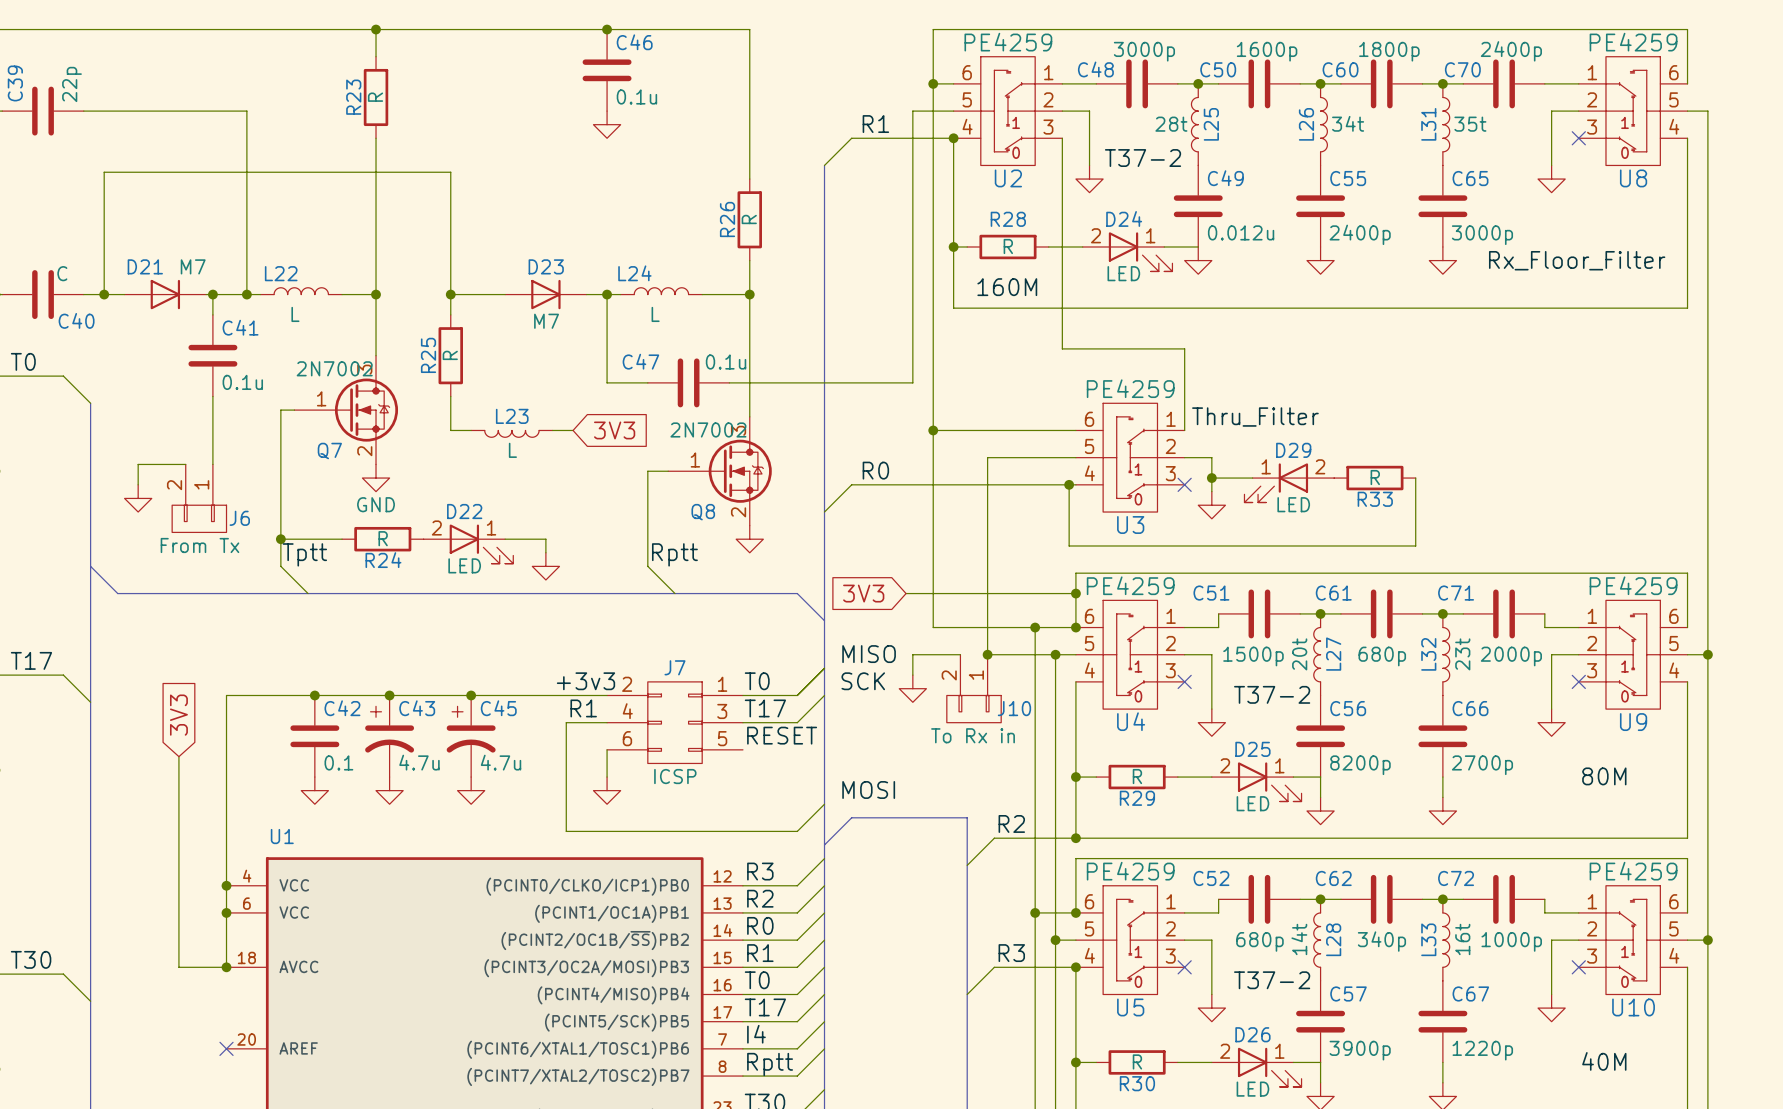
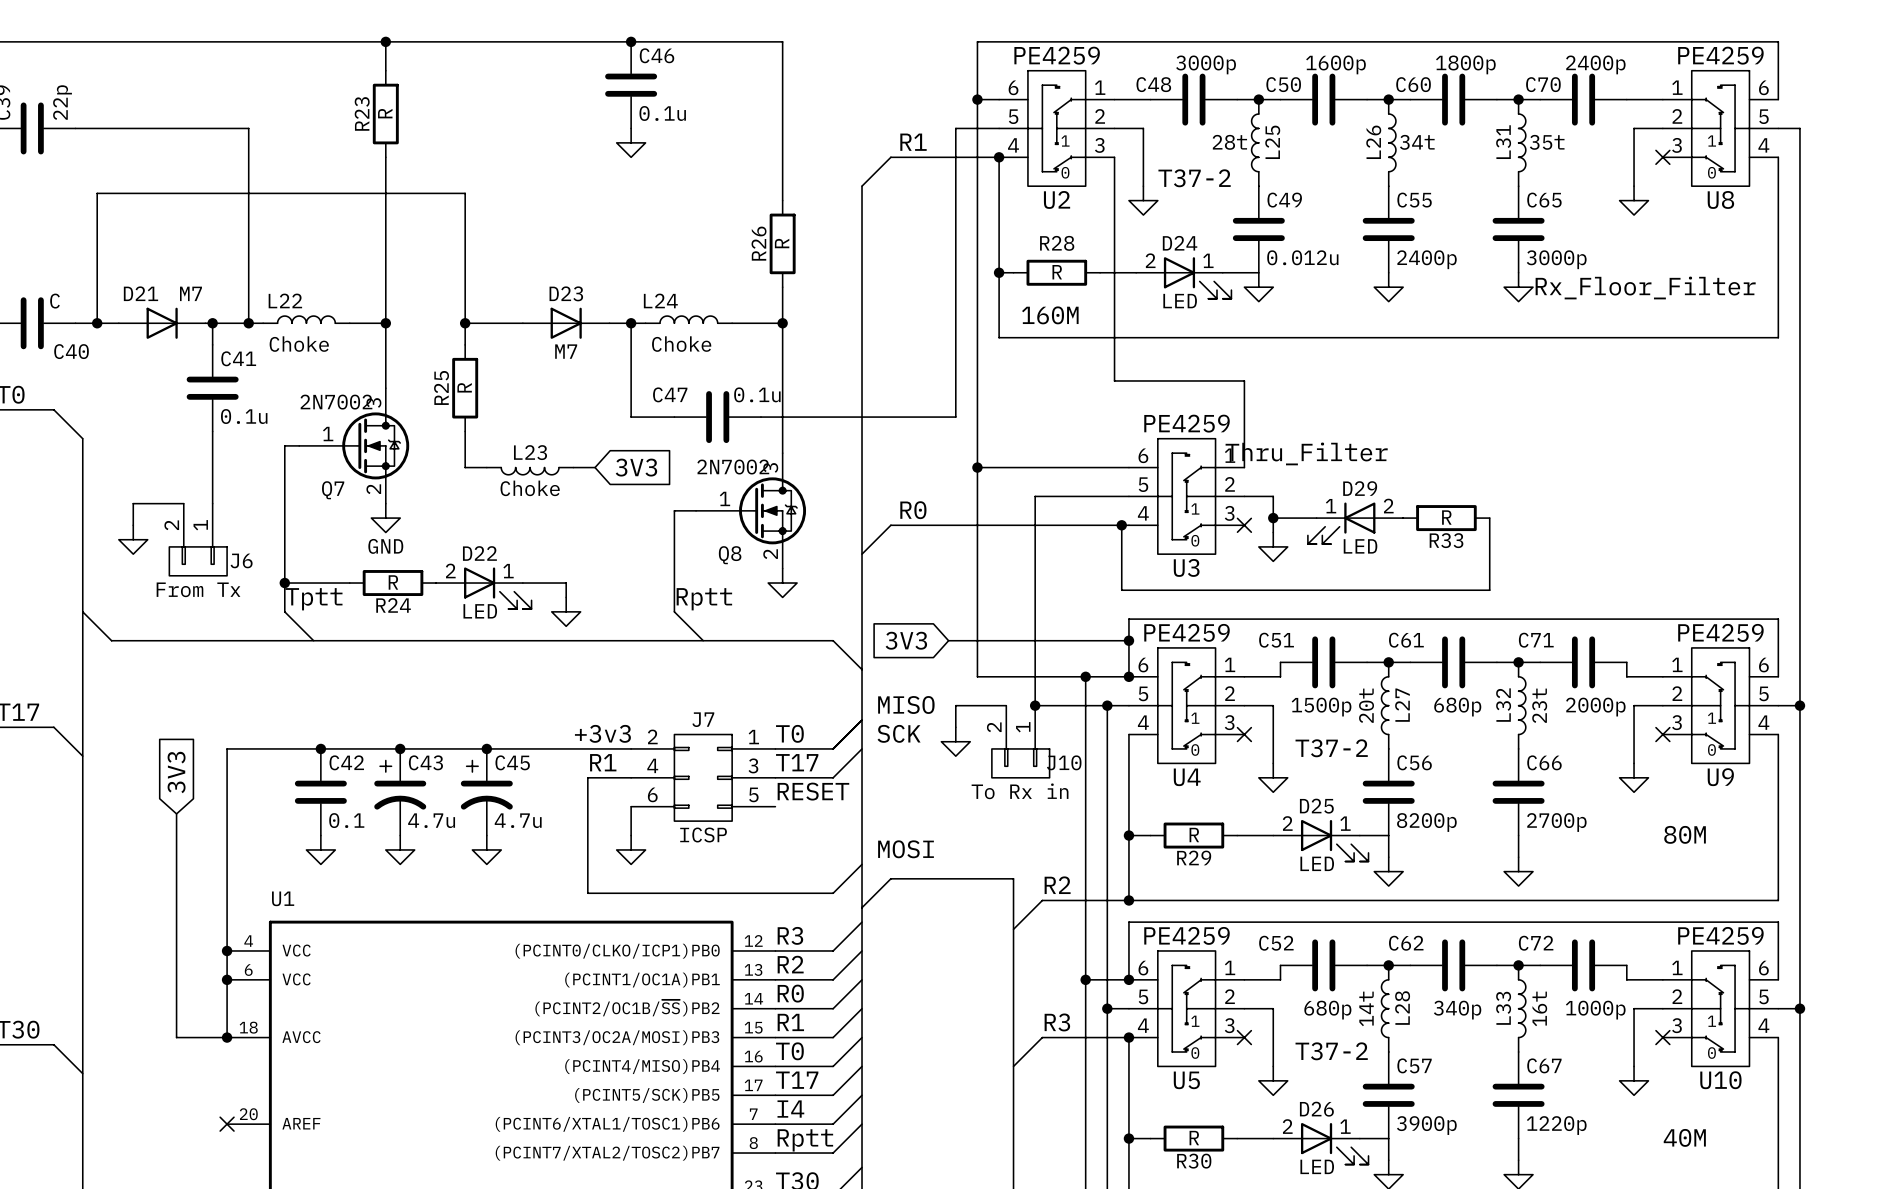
L22 value: L (295, 314) -> Choke (299, 344)
L24 value: L (655, 314) -> Choke (681, 344)
L23 value: L (512, 450) -> Choke (530, 488)

